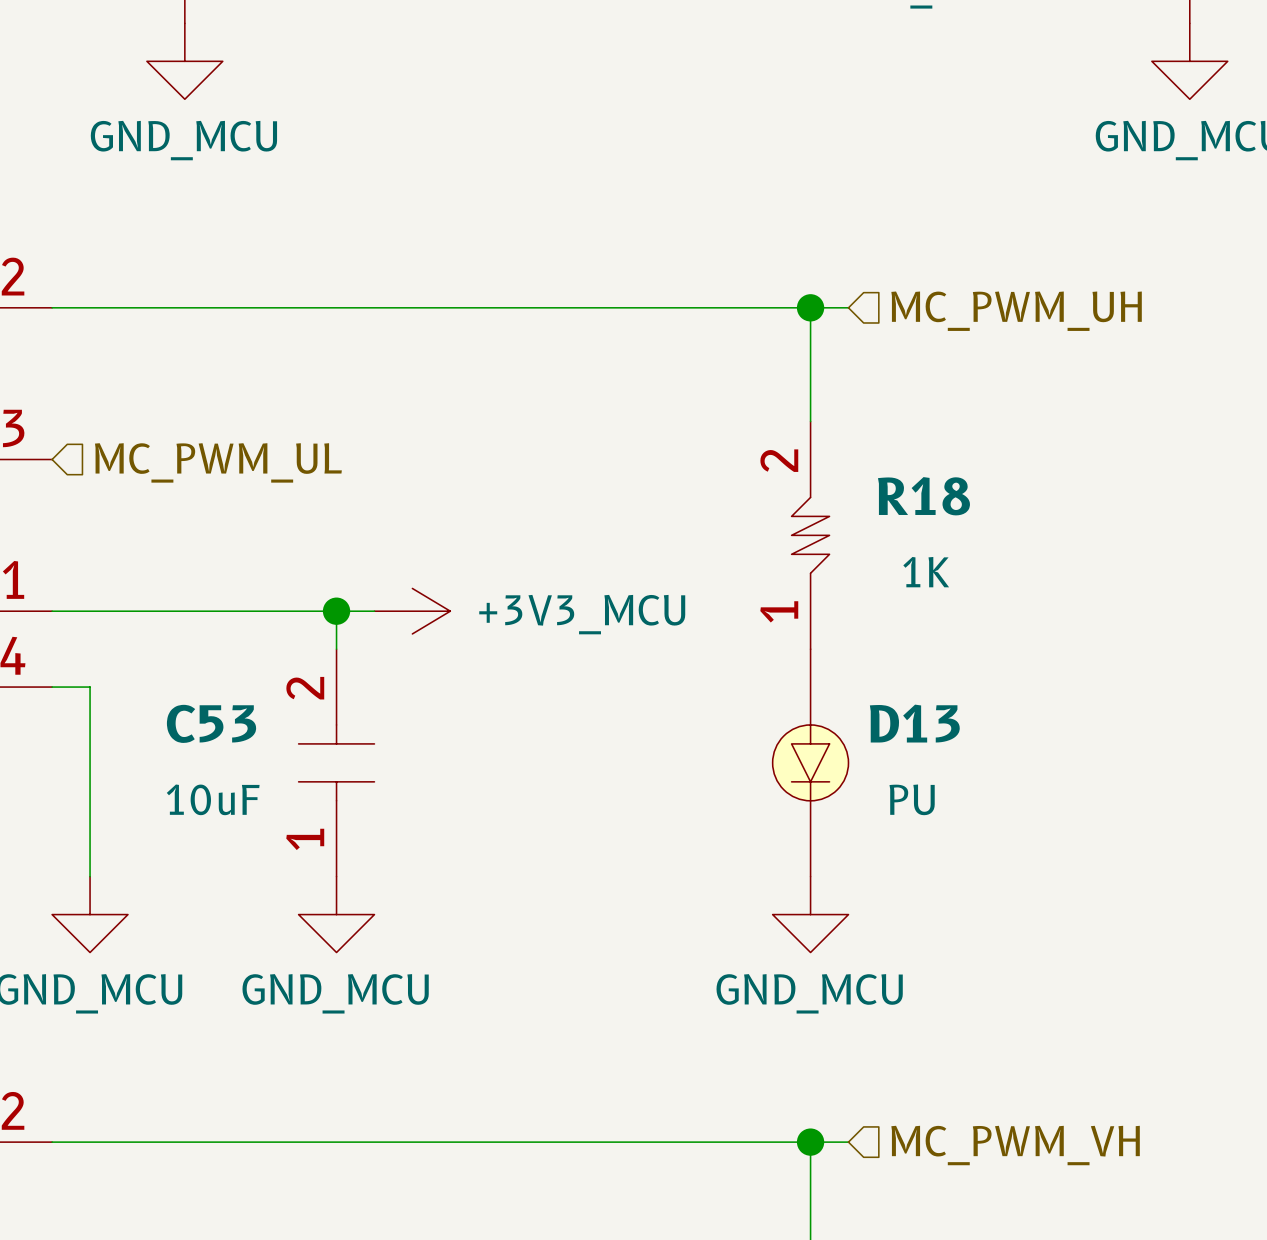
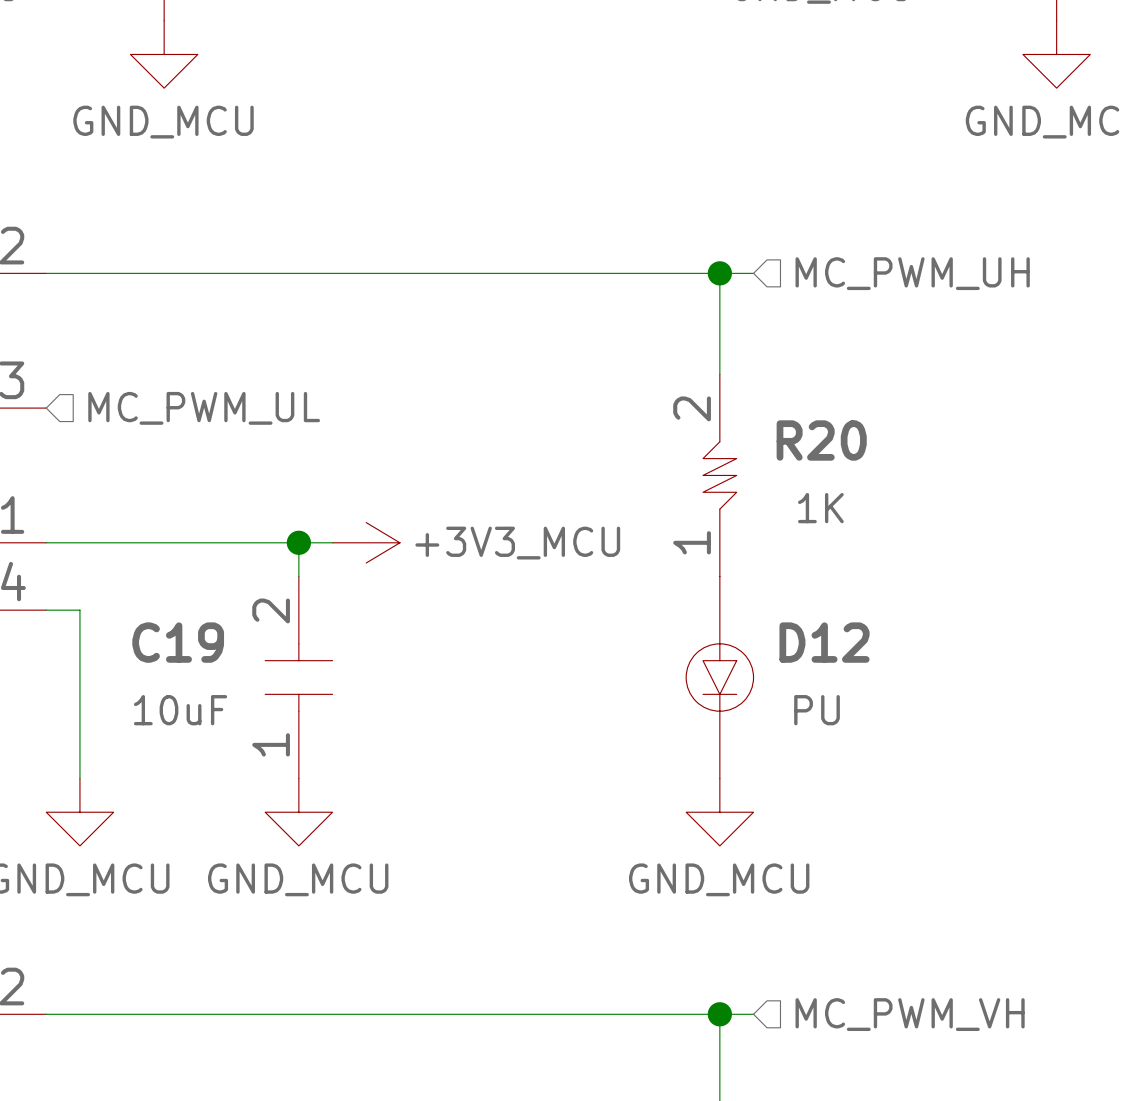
R18 name: R18 (923, 496) -> R20 (821, 440)
C53 name: C53 (211, 723) -> C19 (178, 642)
D13 name: D13 (914, 723) -> D12 (824, 642)

